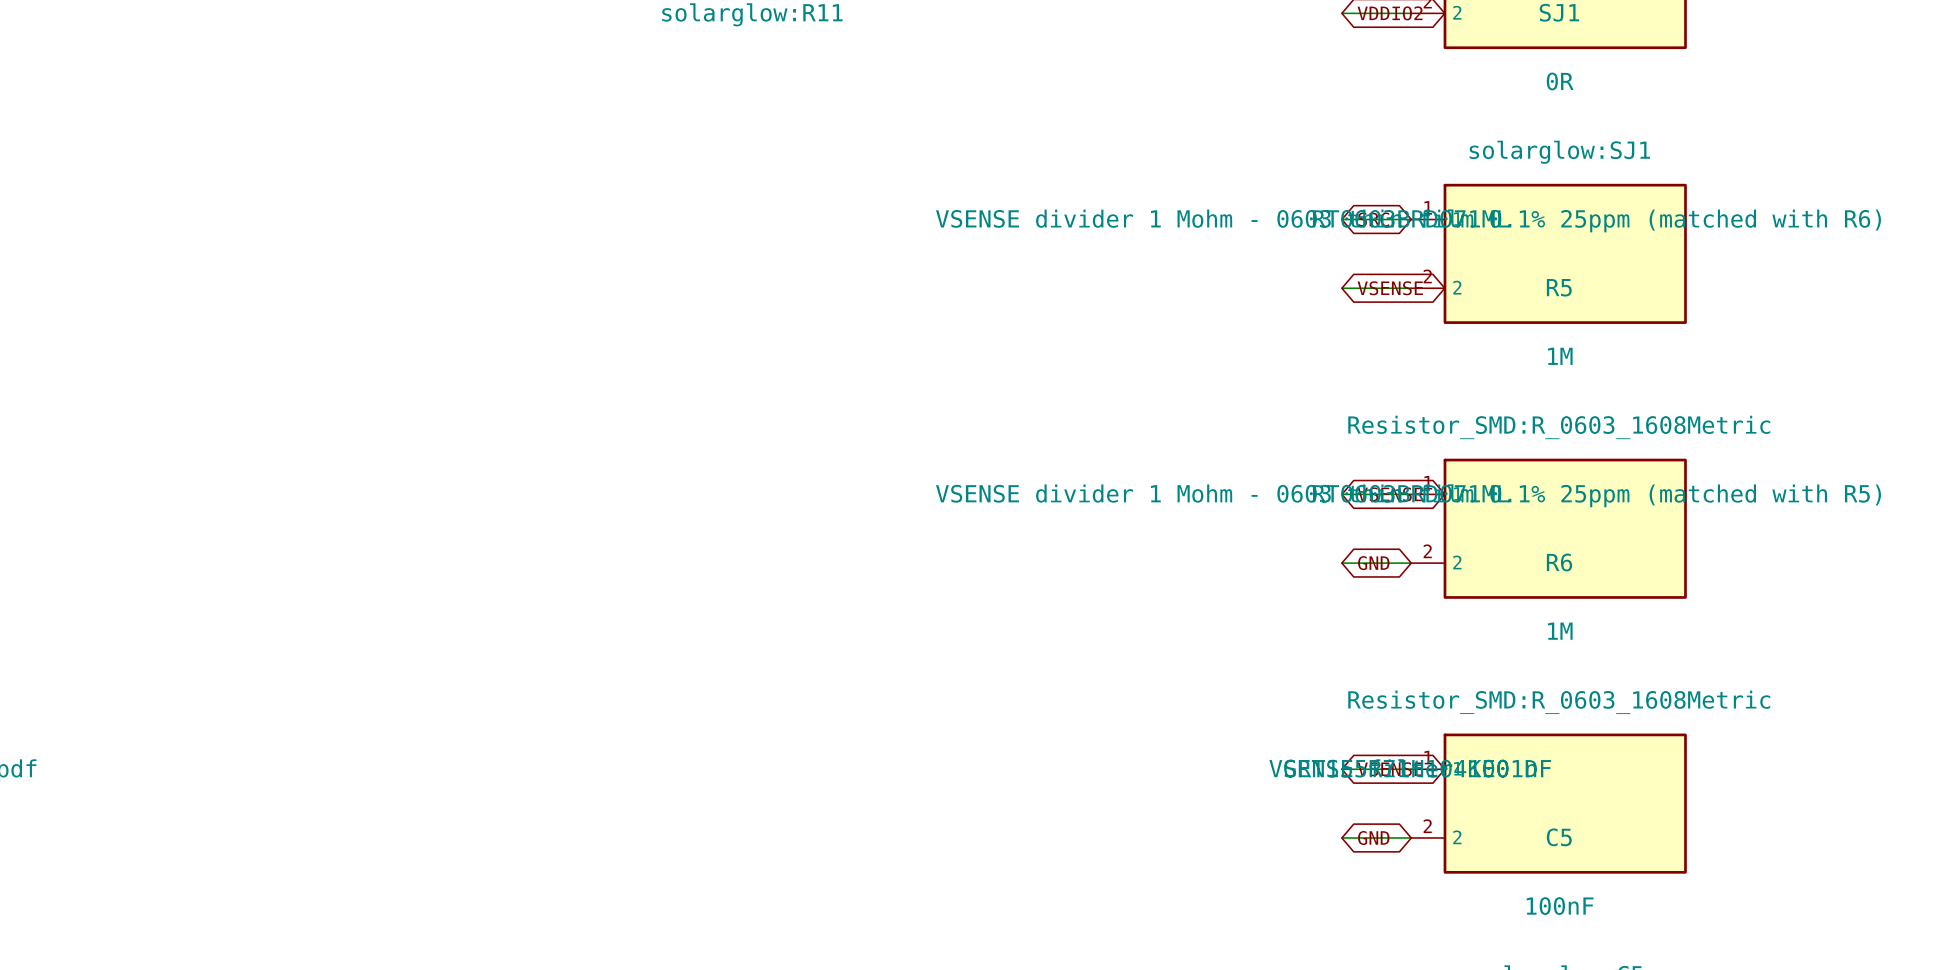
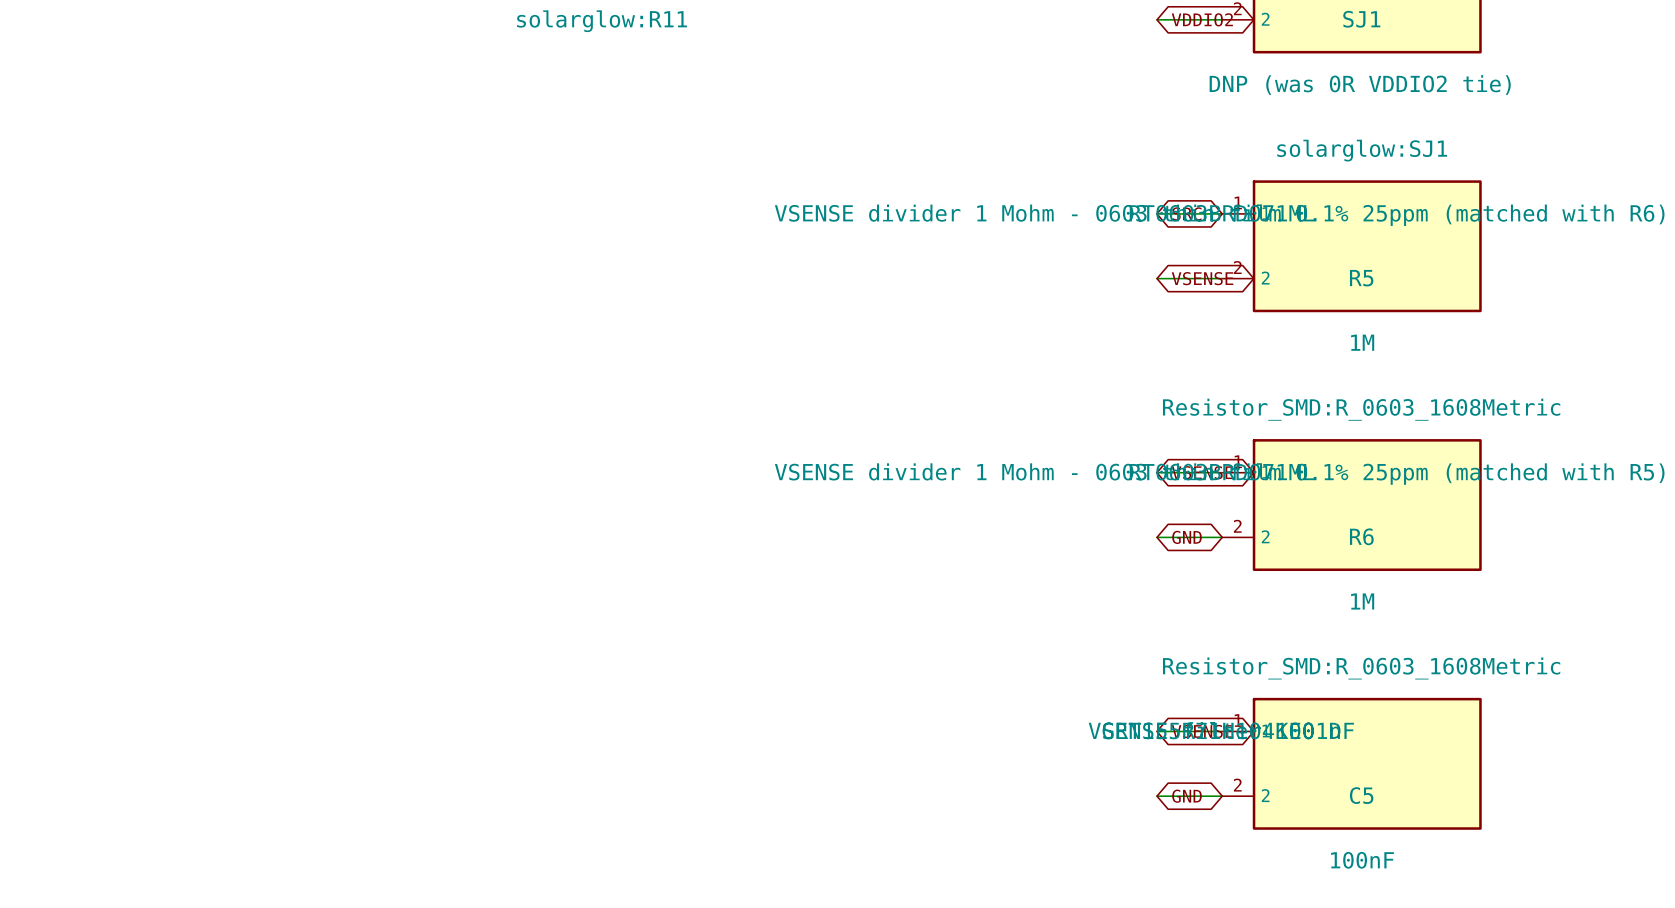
SJ1 value: 0R (1560, 81) -> DNP (was 0R VDDIO2 tie) (1360, 85)

